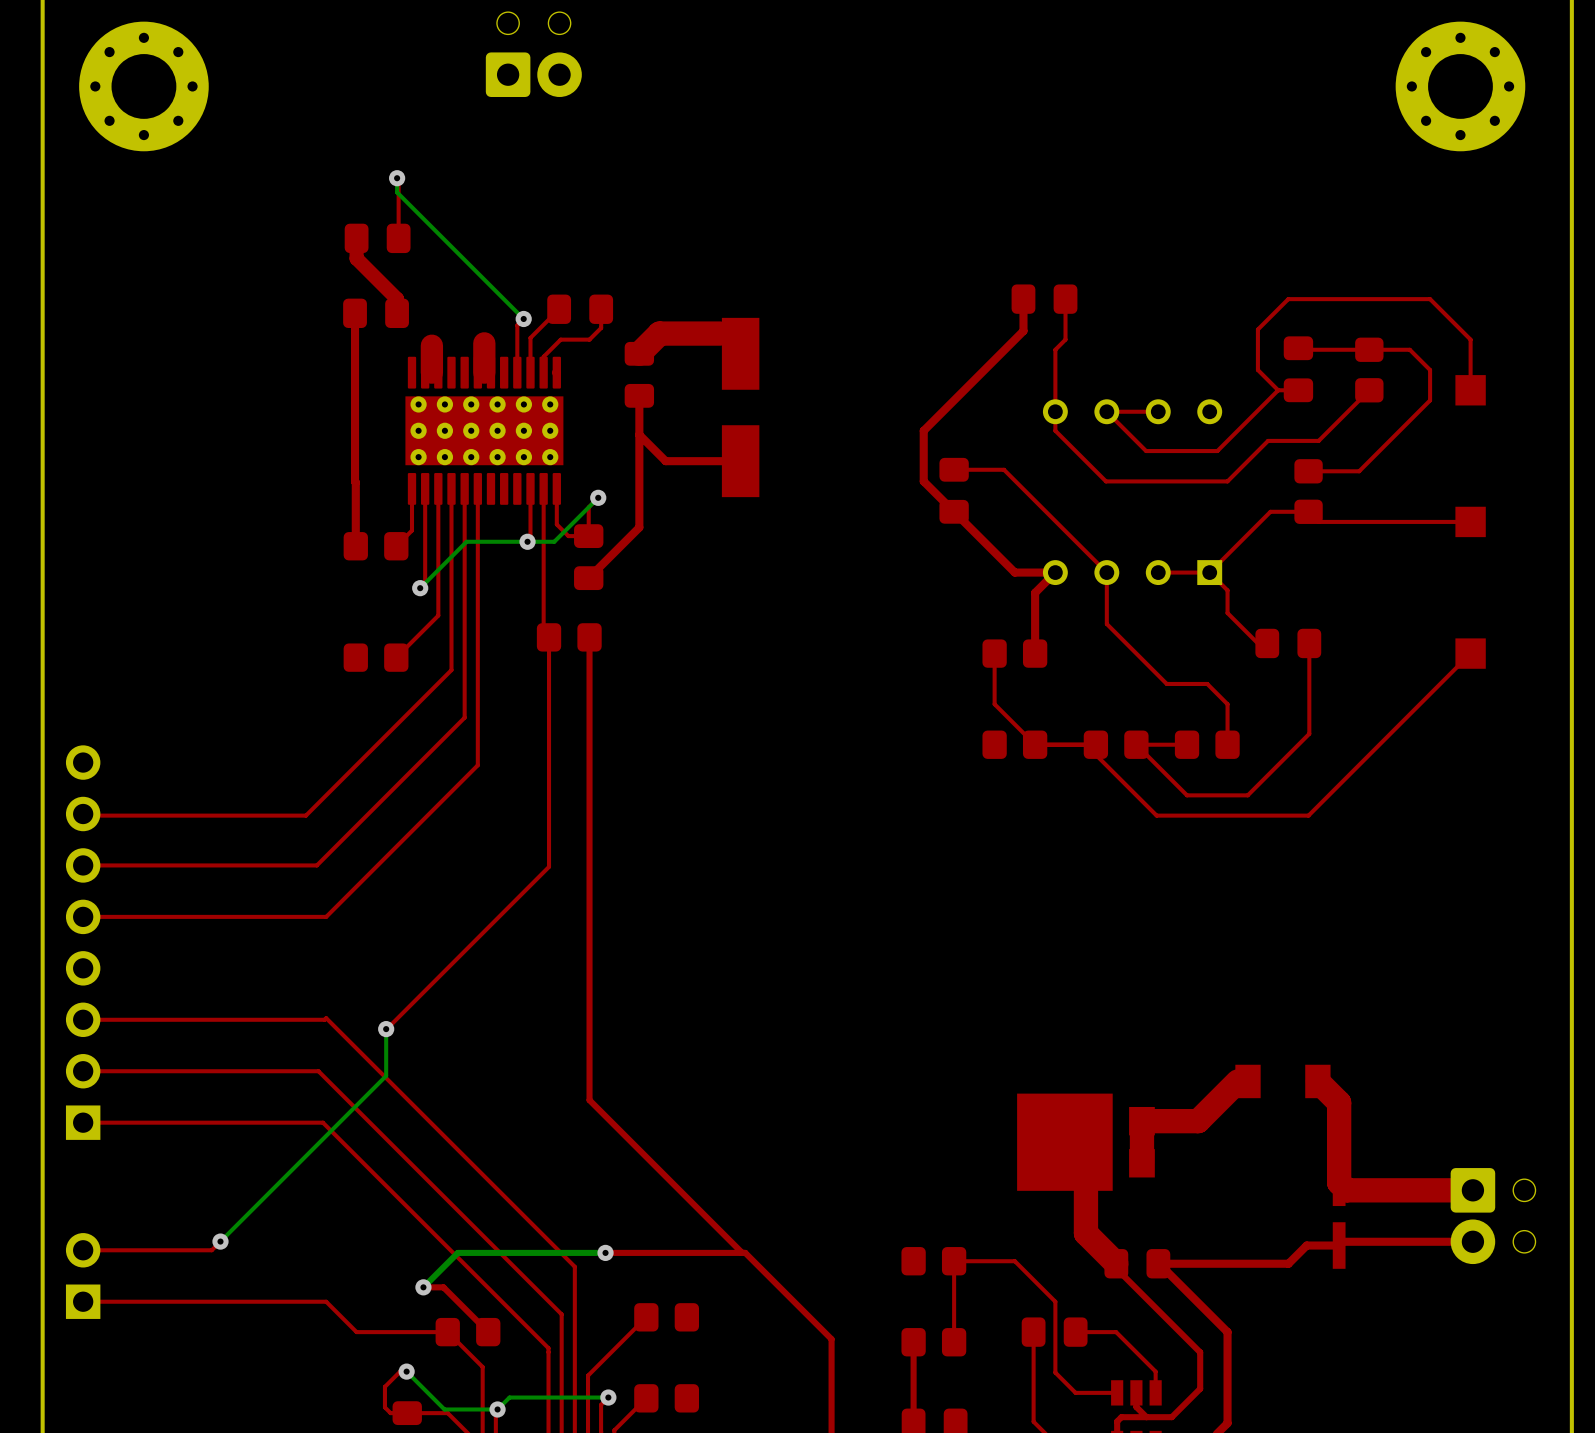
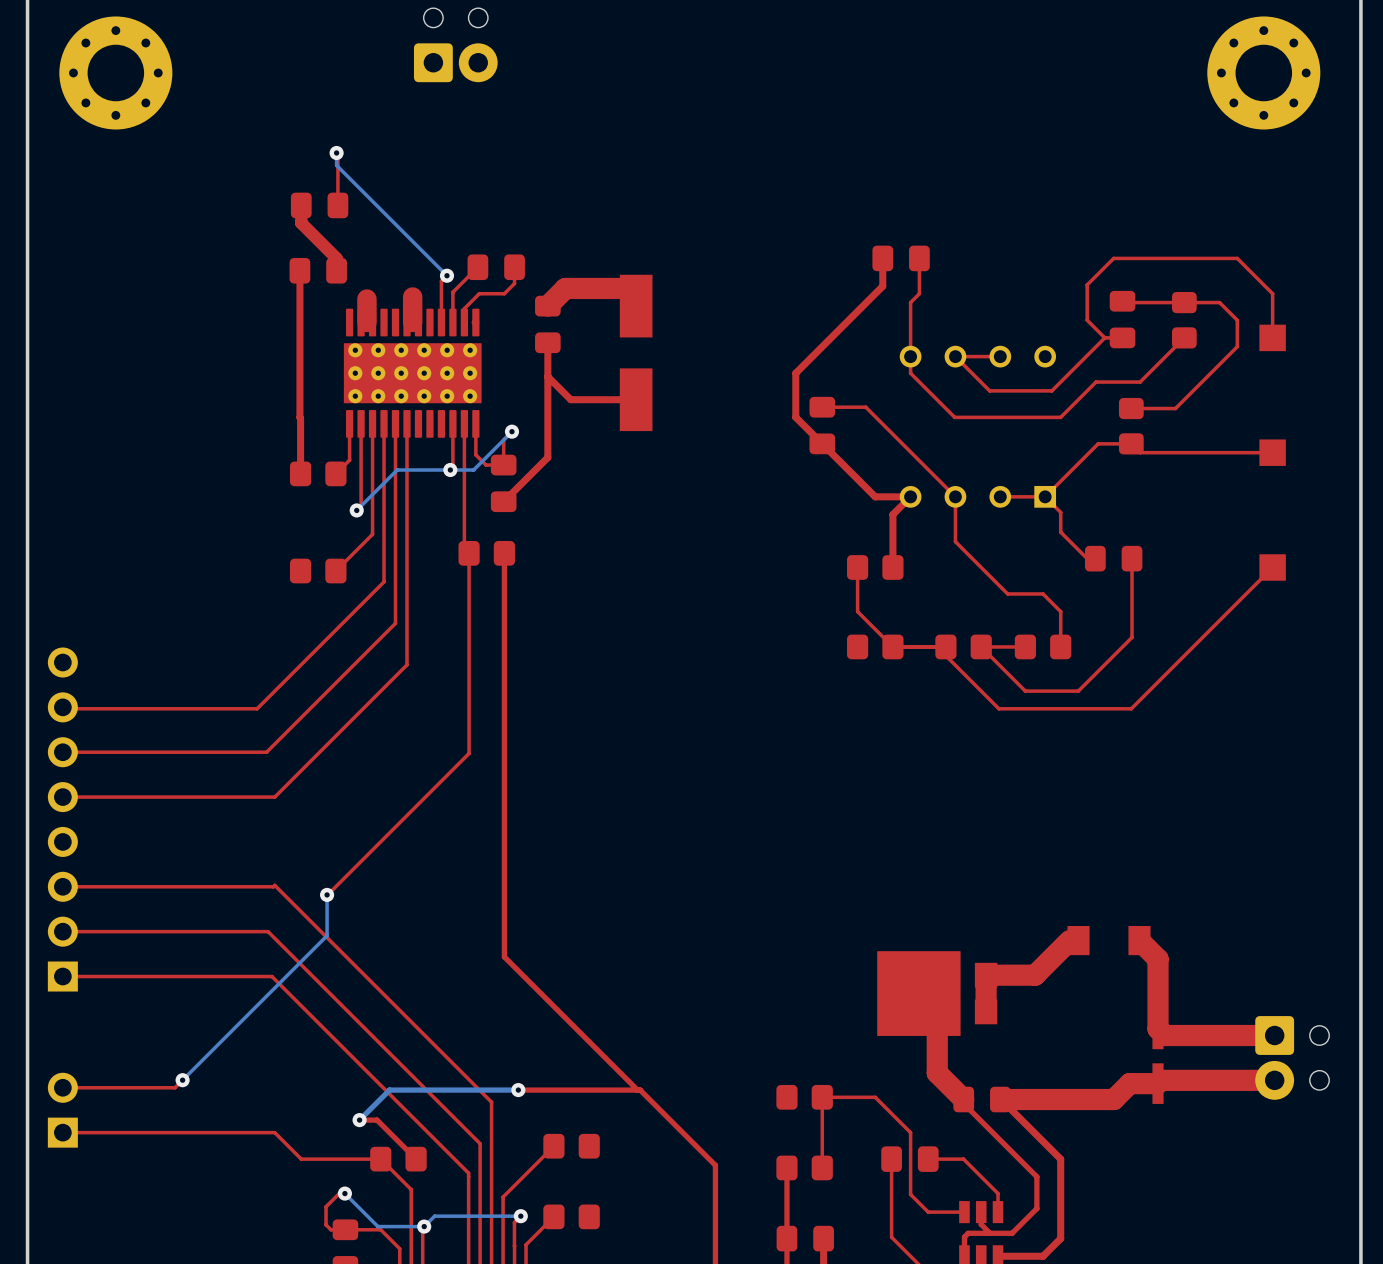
top track width: thin (1472, 1241) (1342, 1241) -> thick (1274, 1080) (1161, 1080)
top track width: thin (1339, 1245) (1306, 1245) (1288, 1263) (1159, 1263) -> thick (1158, 1083) (1129, 1083) (1113, 1099) (1001, 1099)

